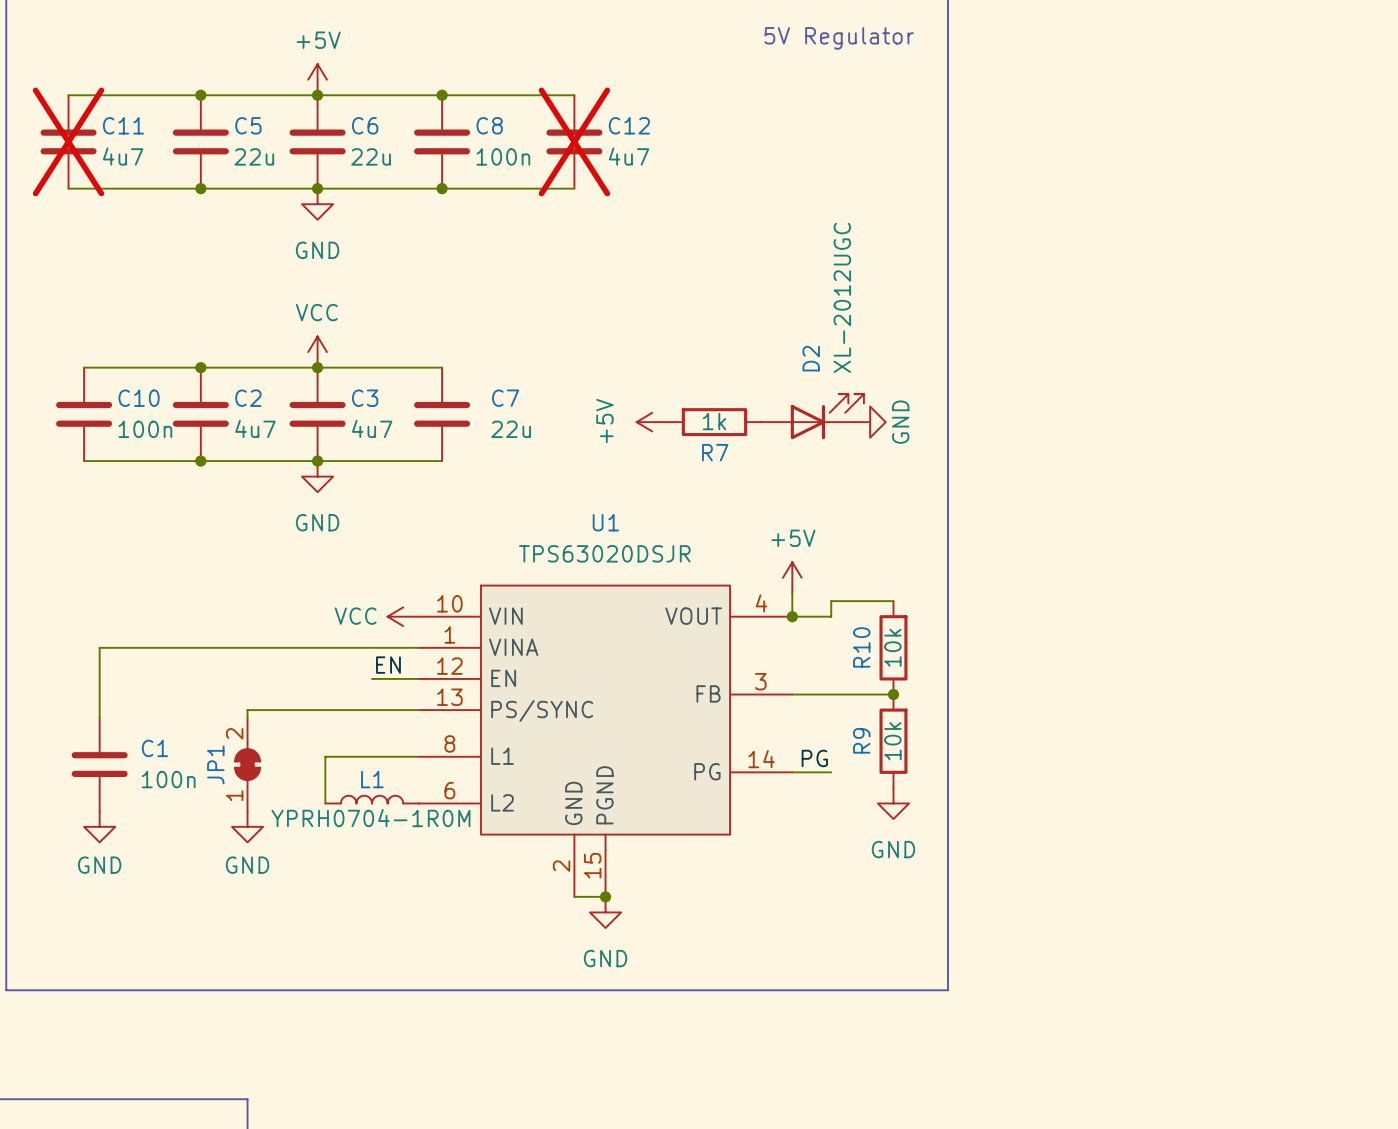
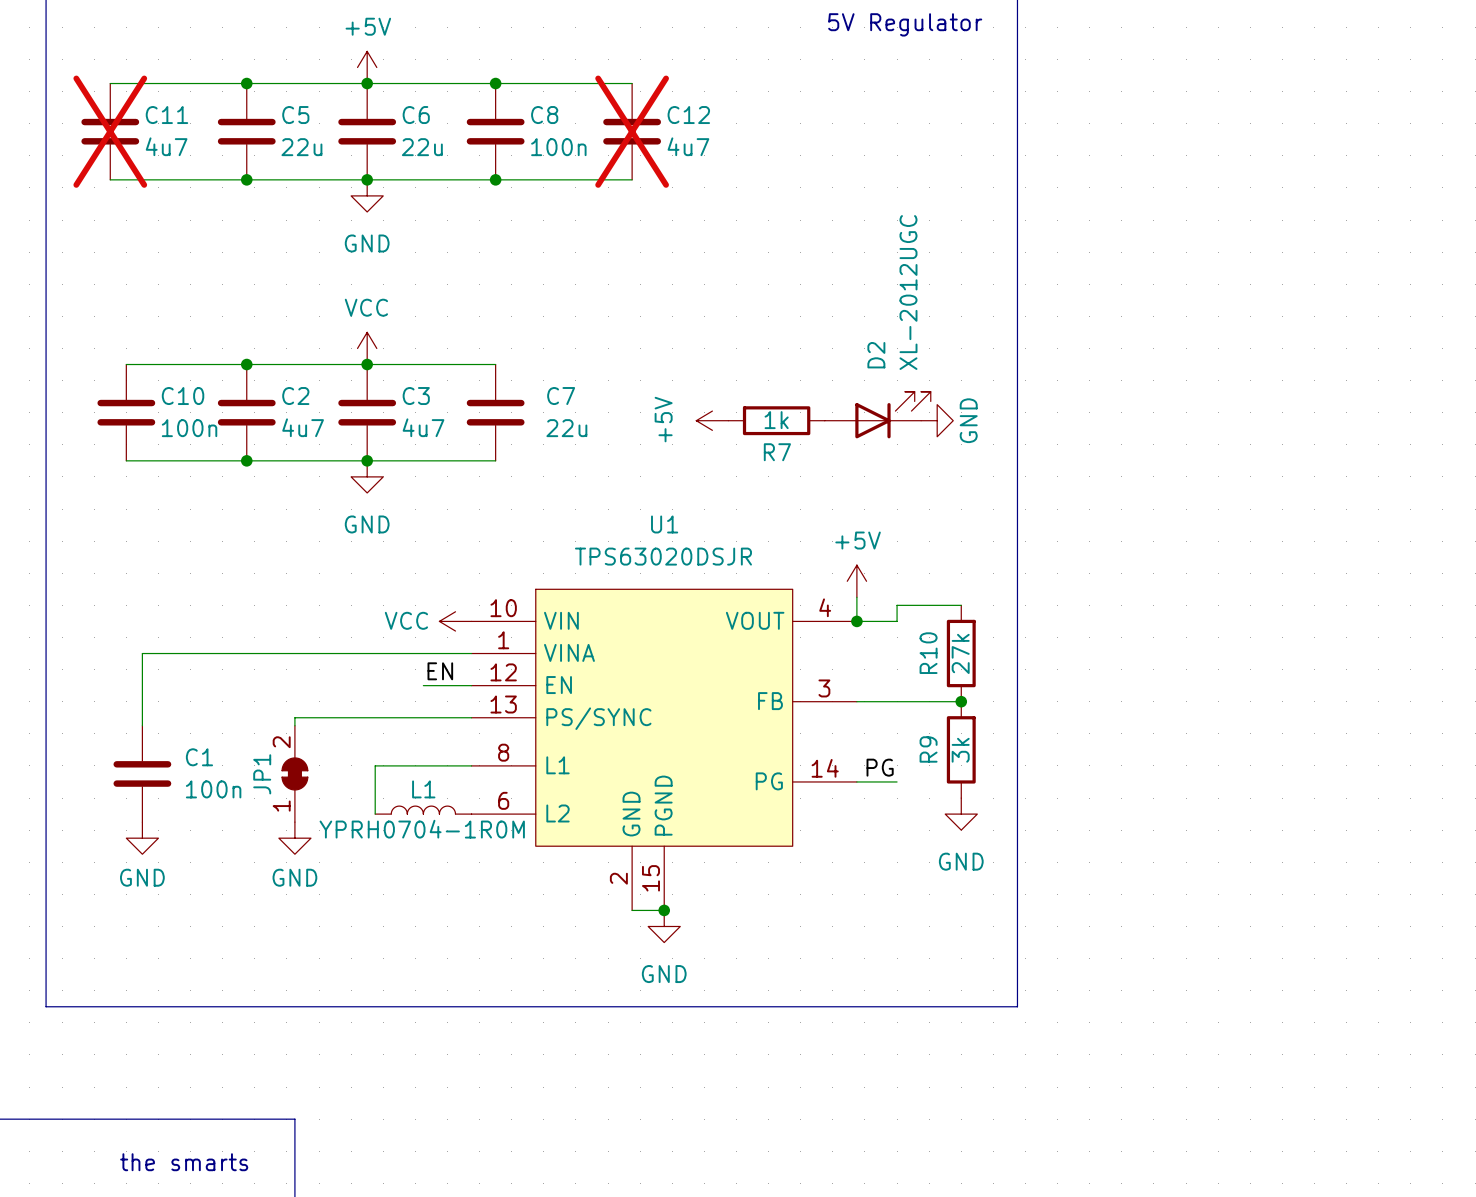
R10 value: 10k (892, 647) -> 27k (960, 653)
R9 value: 10k (892, 741) -> 3k (960, 750)

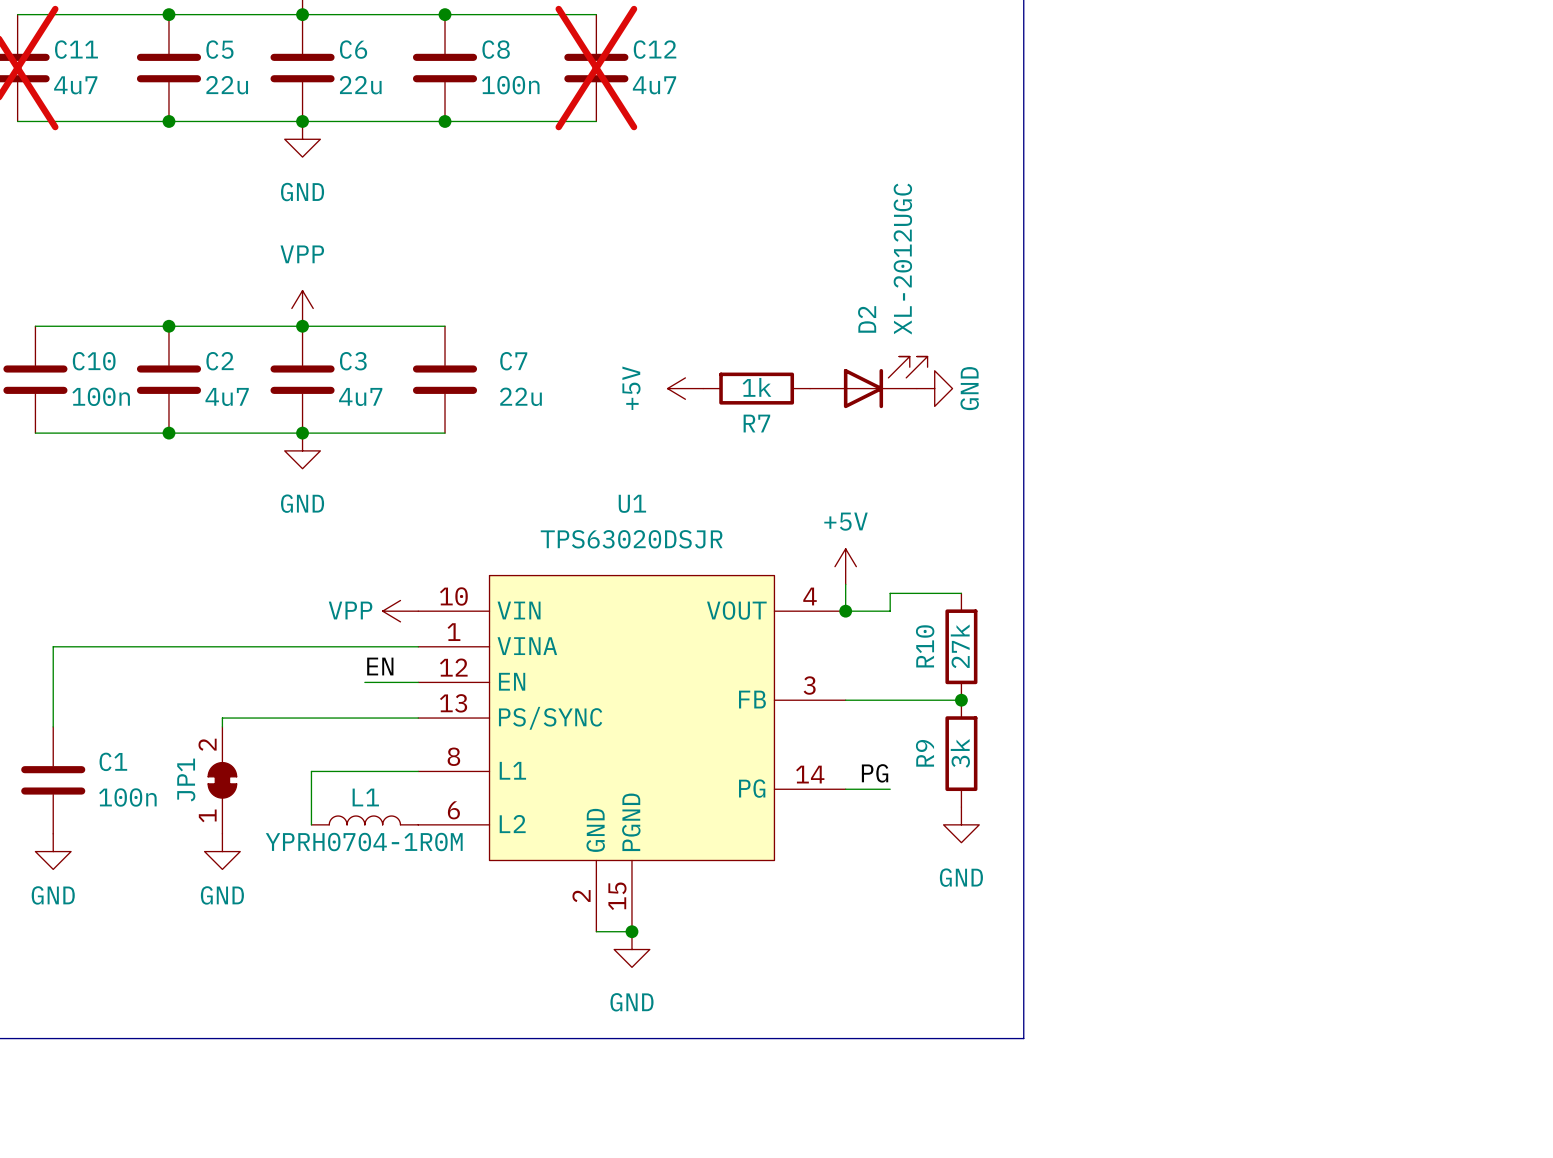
power symbol: VCC (367, 348) -> VPP (302, 308)
power symbol: VCC (455, 621) -> VPP (400, 611)

